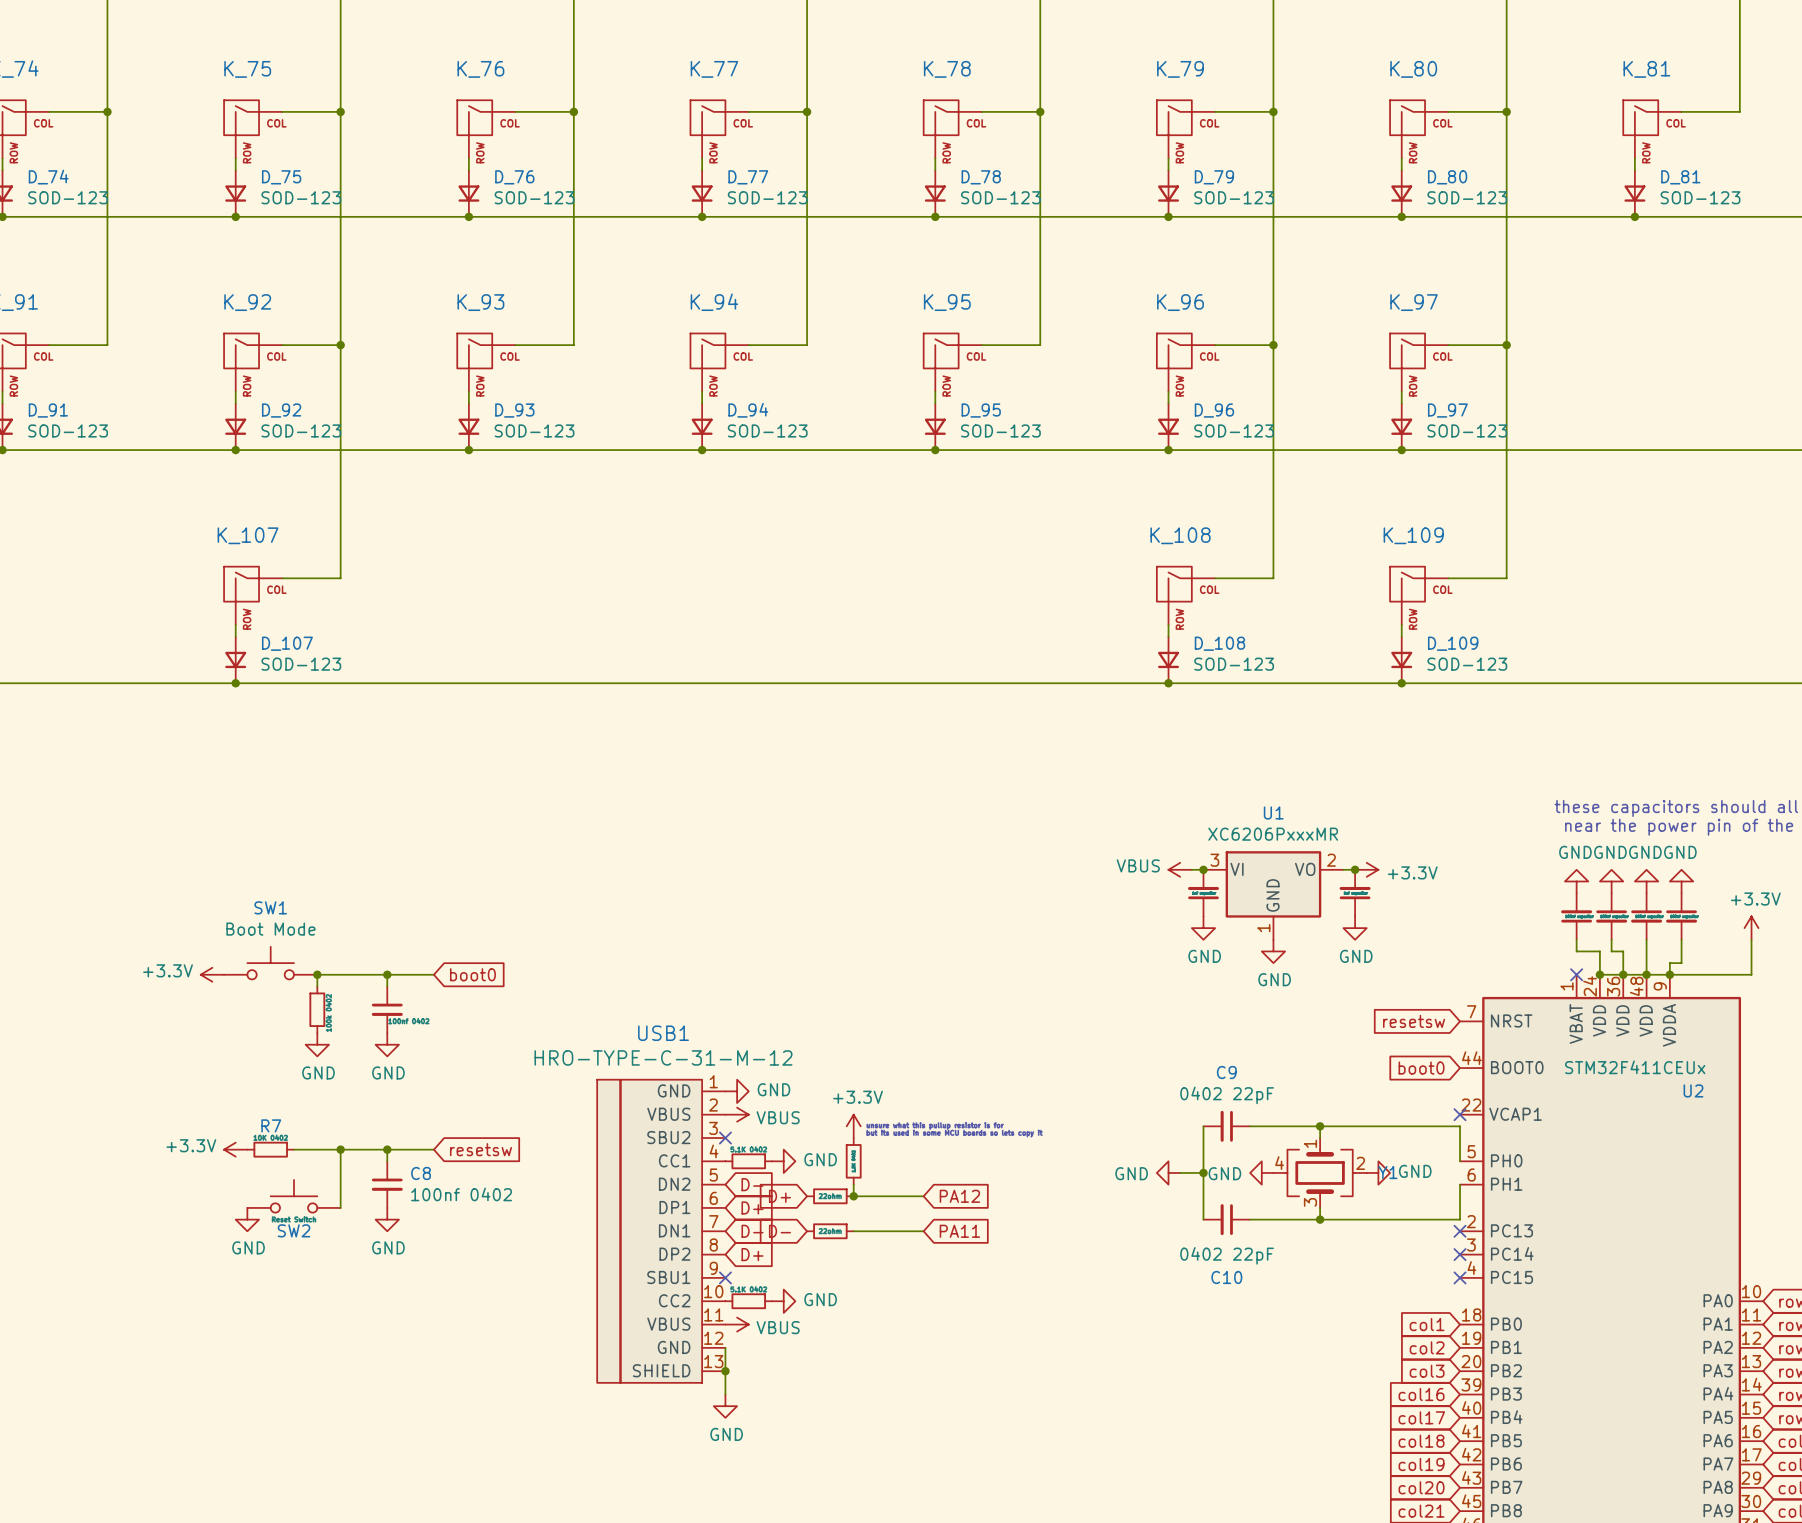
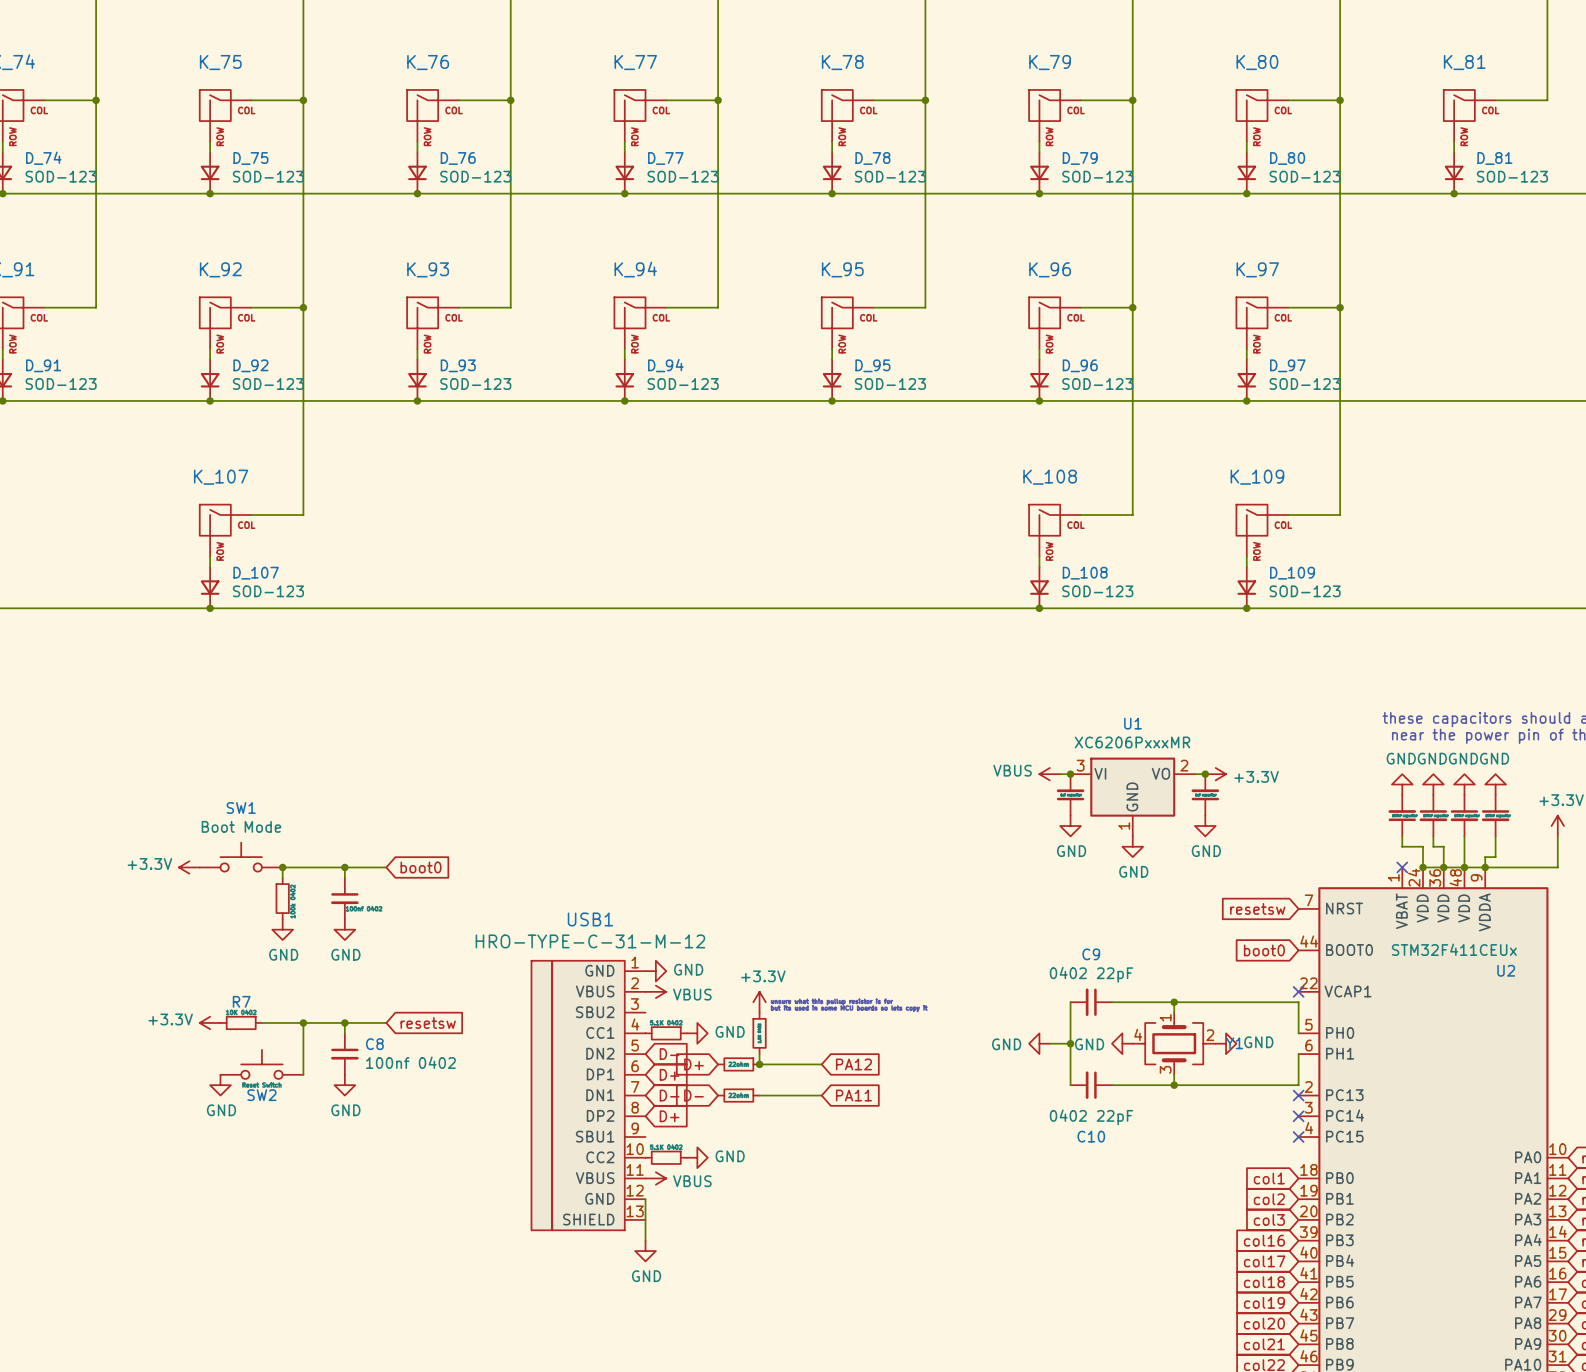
no-connect mark: (725, 1138) -> none
no-connect mark: (725, 1277) -> none
junction: (725, 1371) -> none

